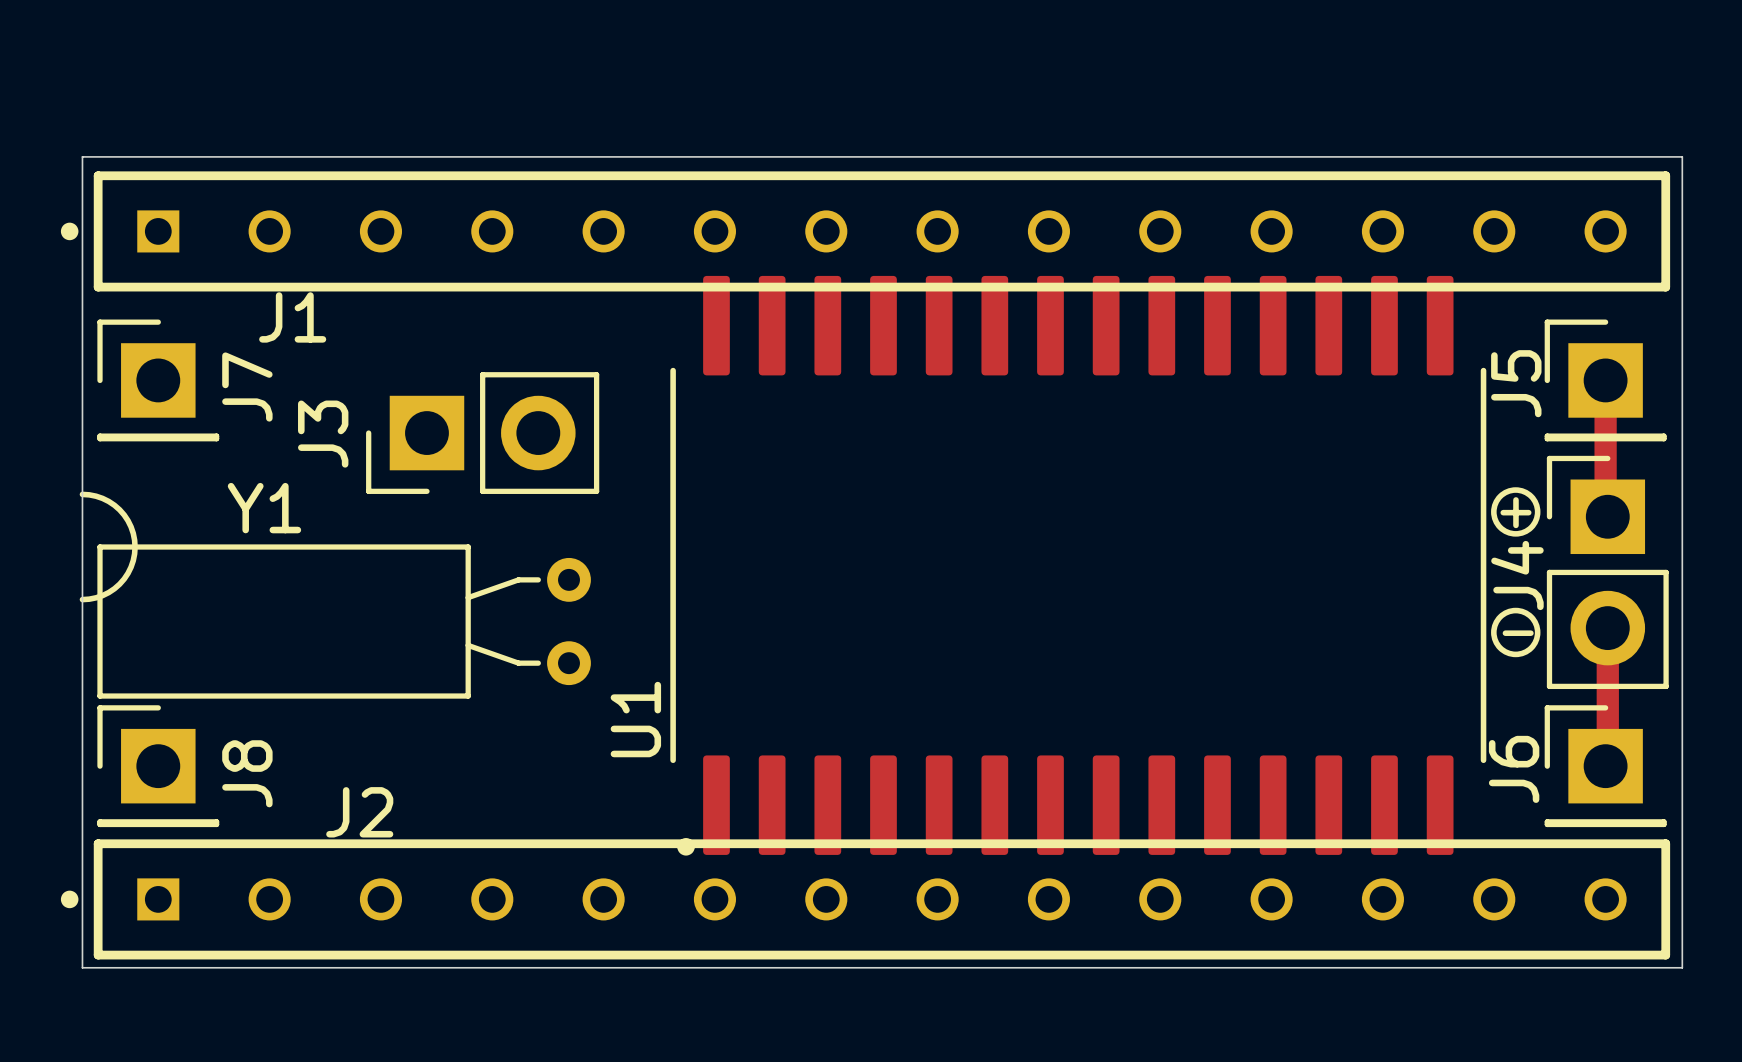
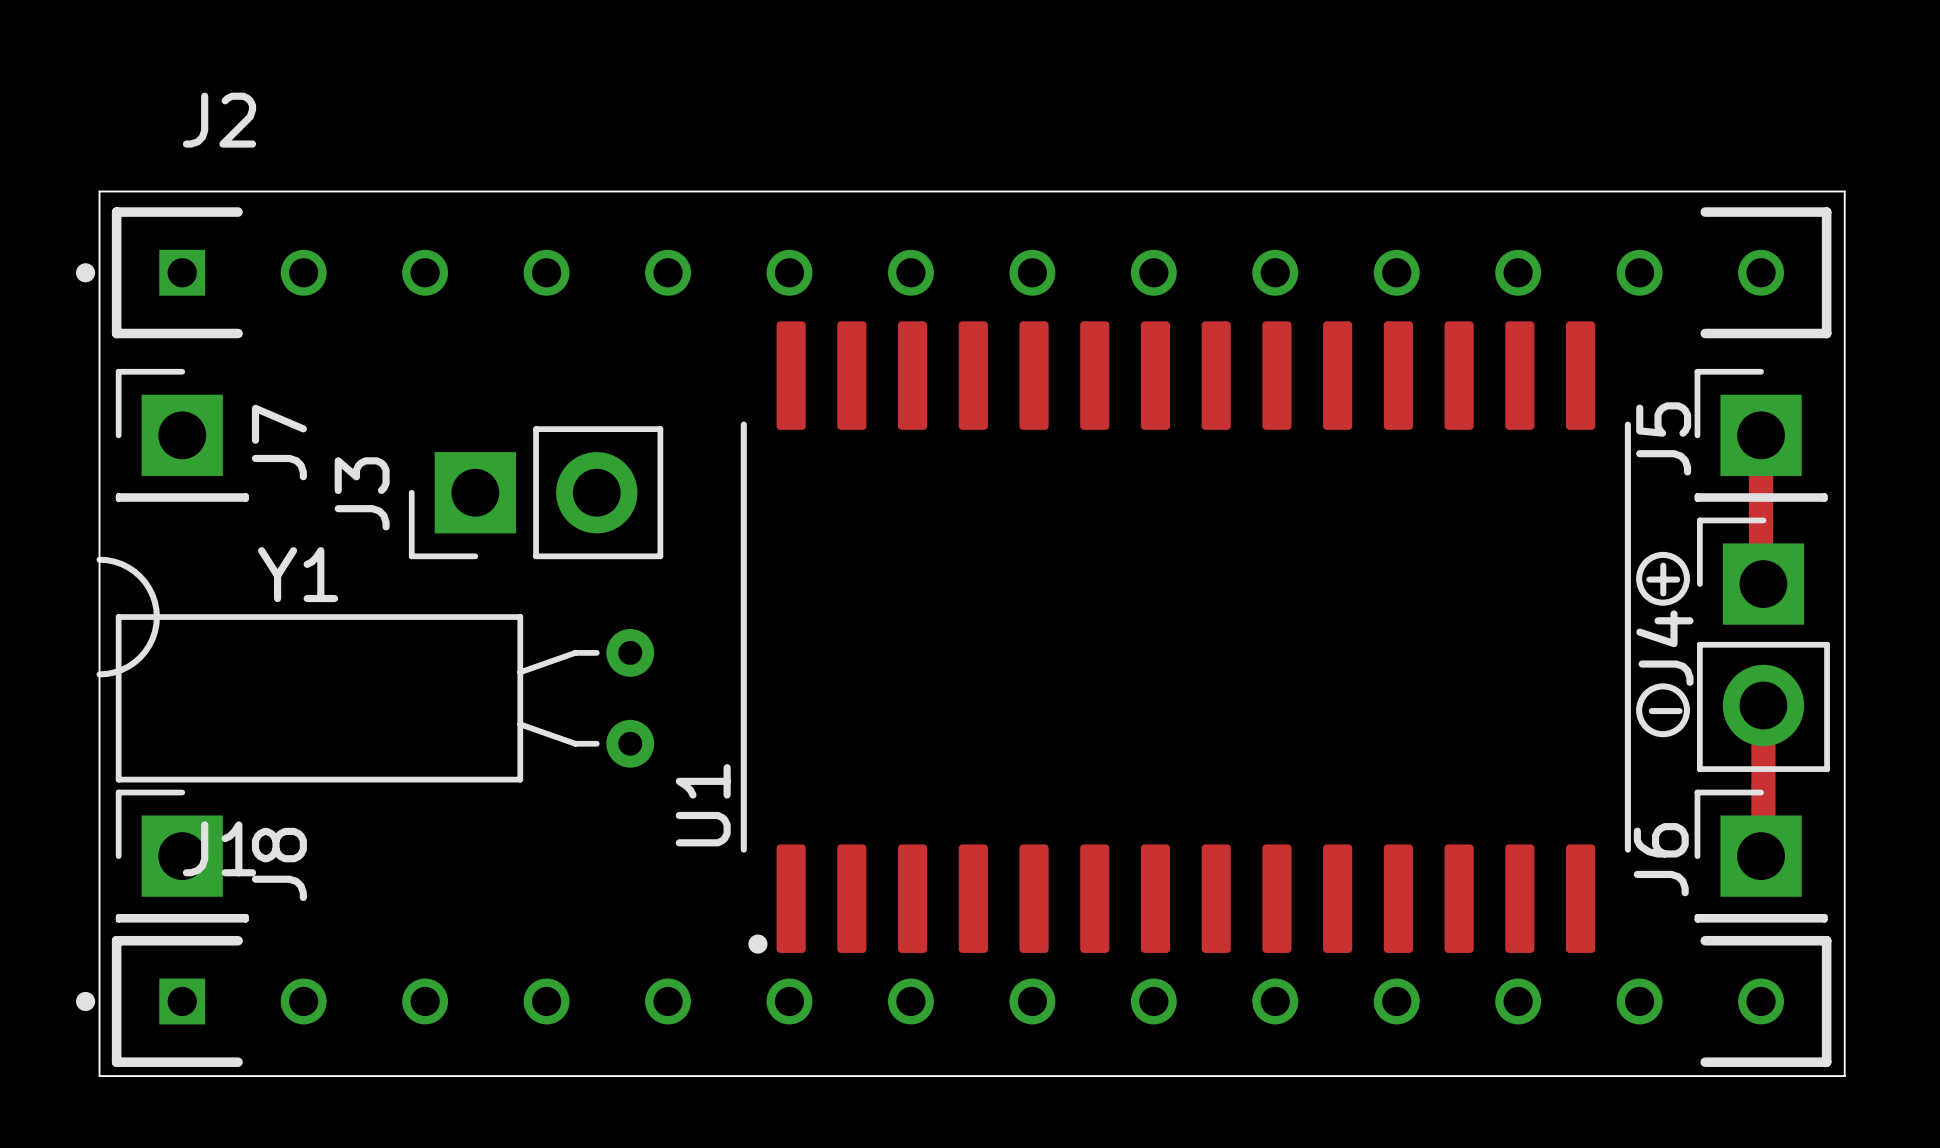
J1 footprint: [60, 171, 1671, 292] -> [76, 935, 1832, 1067]
J1 name position: J1 (292, 317) -> J1 (219, 848)
J2 name position: J2 (359, 812) -> J2 (219, 120)
J2 footprint: [60, 839, 1671, 960] -> [76, 207, 1832, 339]

